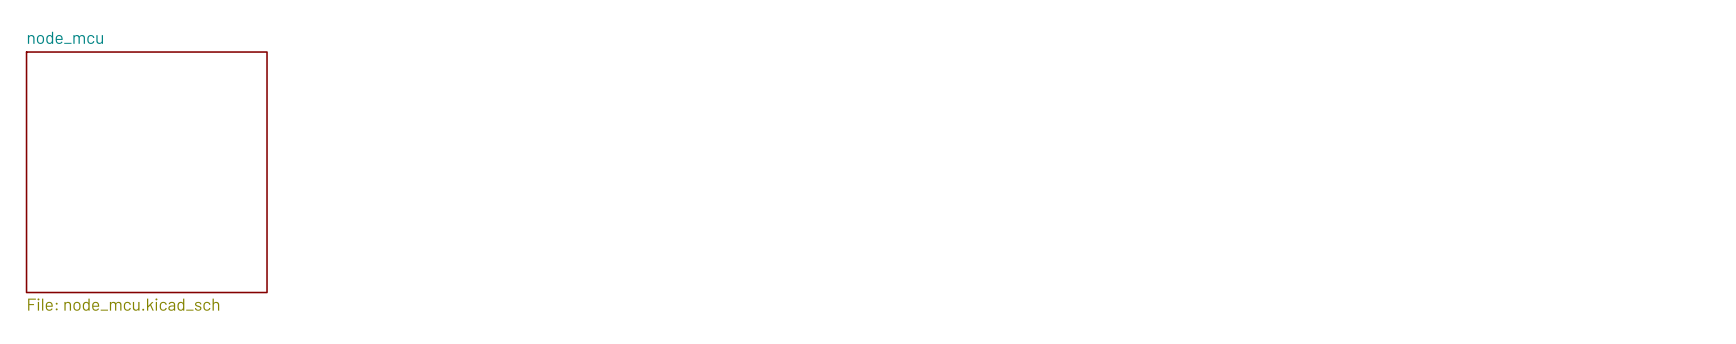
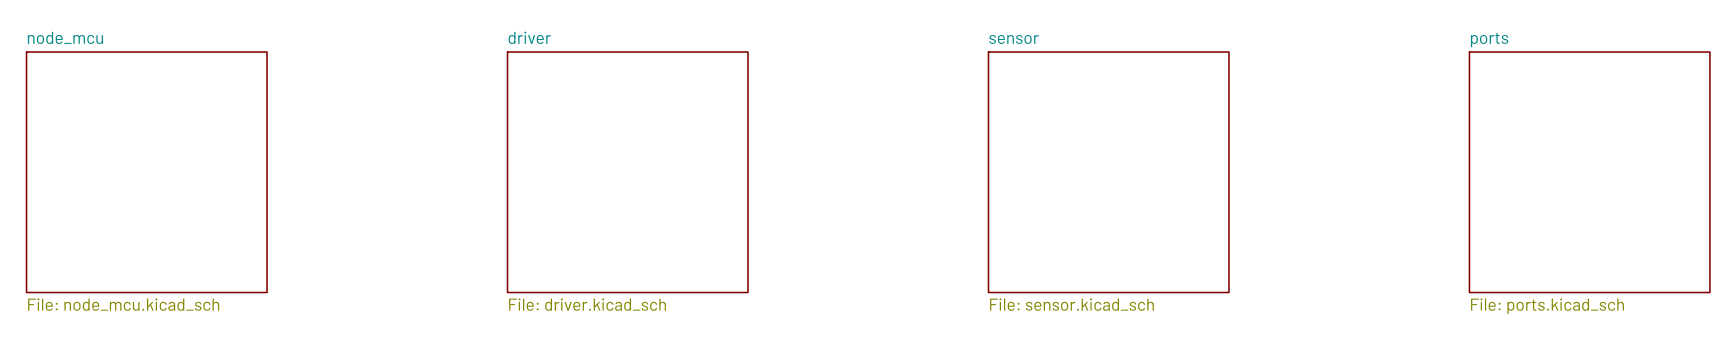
sheet driver: none -> File: driver.kicad_sch (627, 172)
sheet sensor: none -> File: sensor.kicad_sch (1108, 172)
sheet ports: none -> File: ports.kicad_sch (1589, 172)

